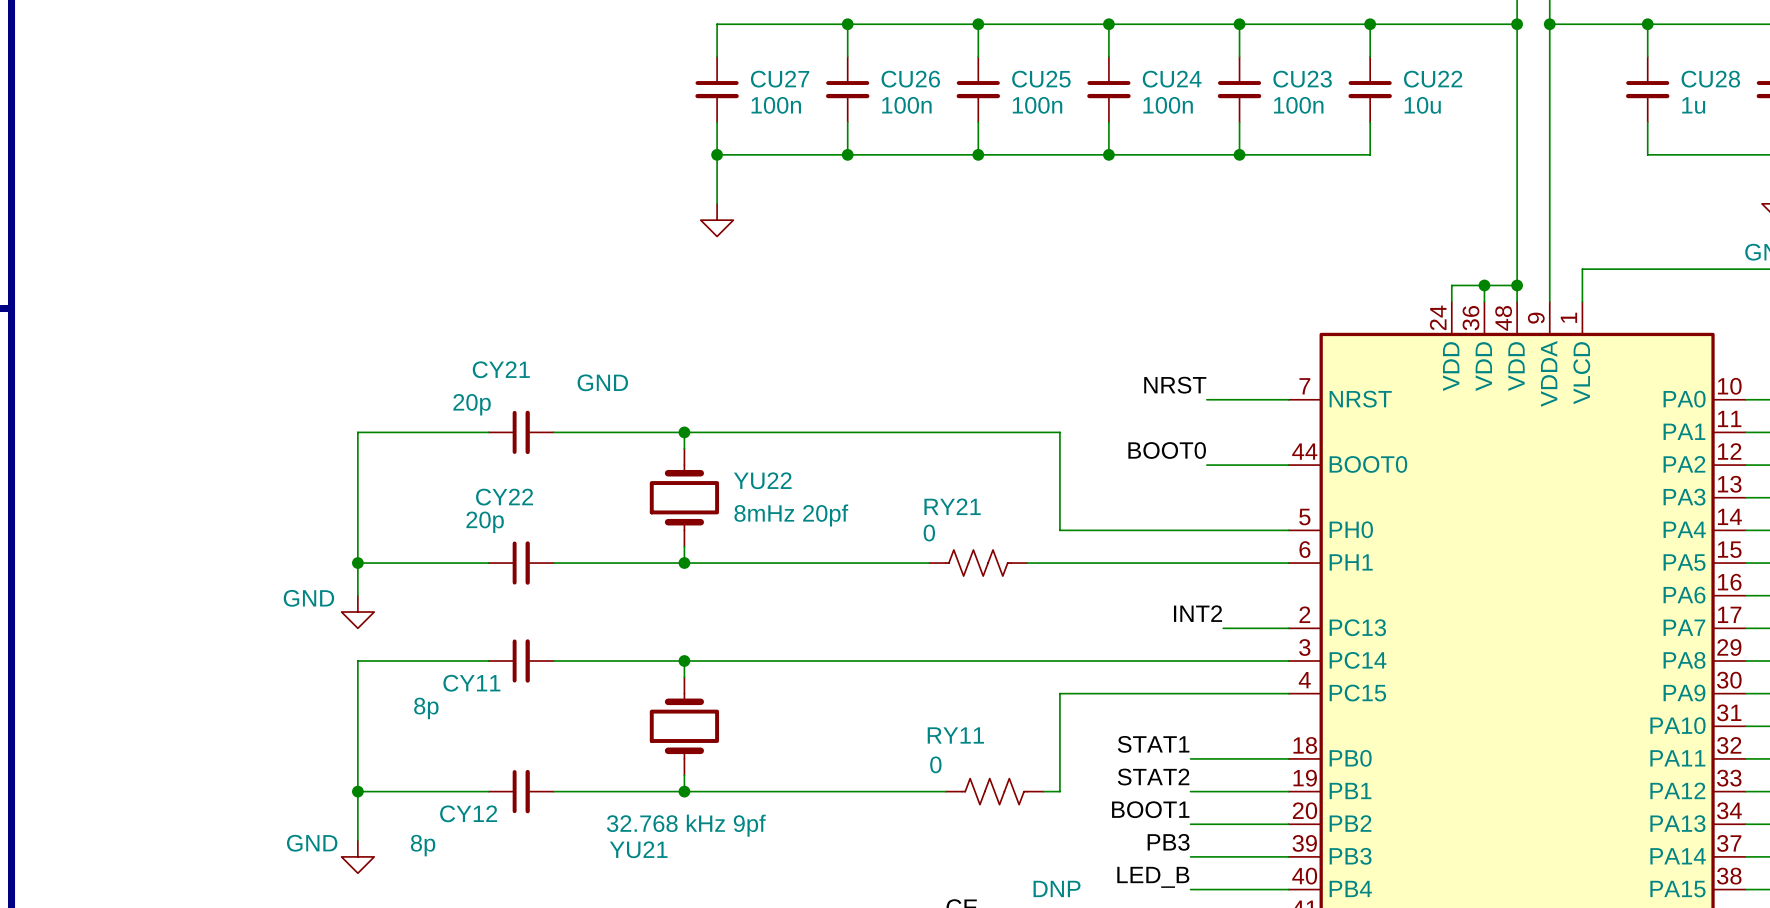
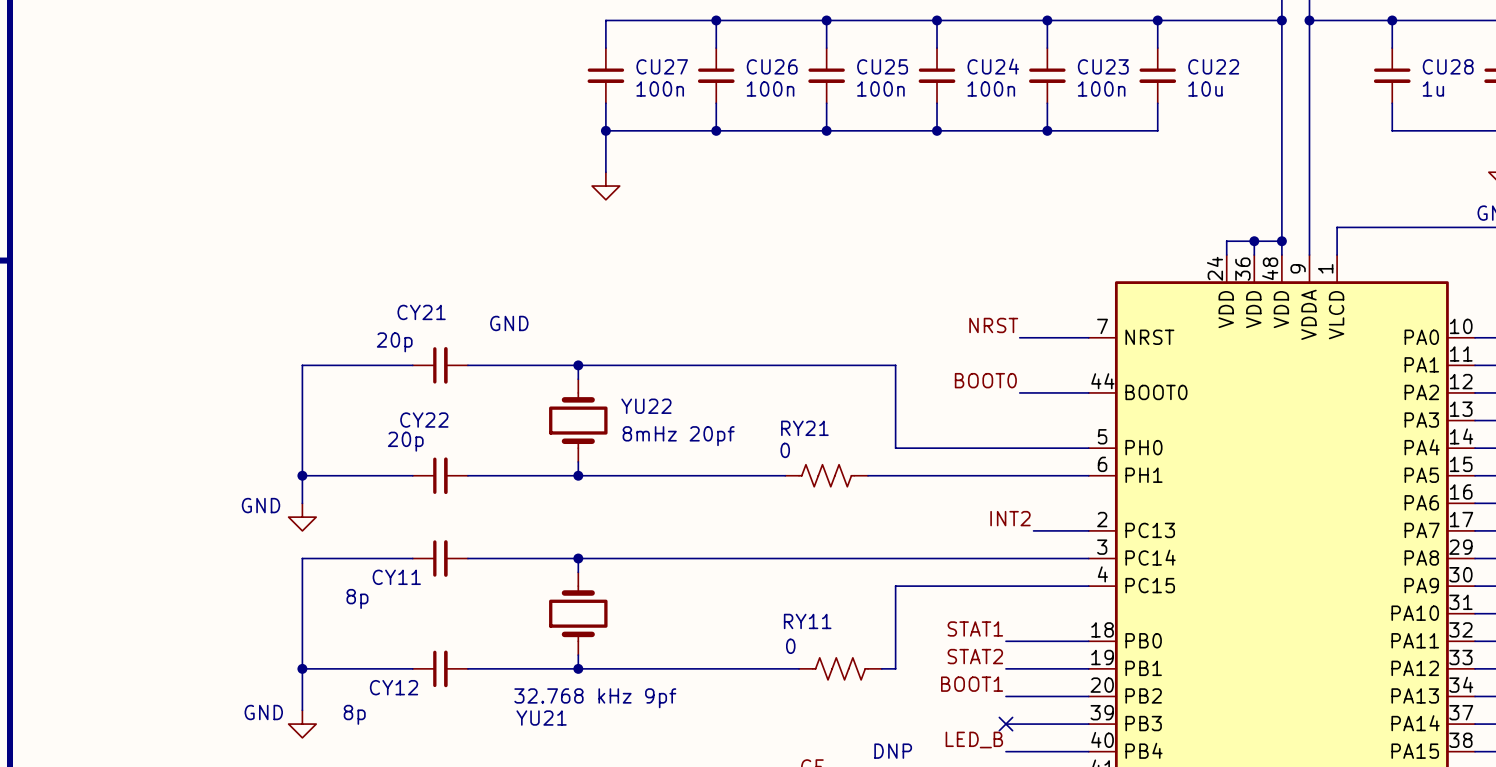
label: PB3 (1168, 842) -> none
no-connect mark: none -> (1005, 724)

